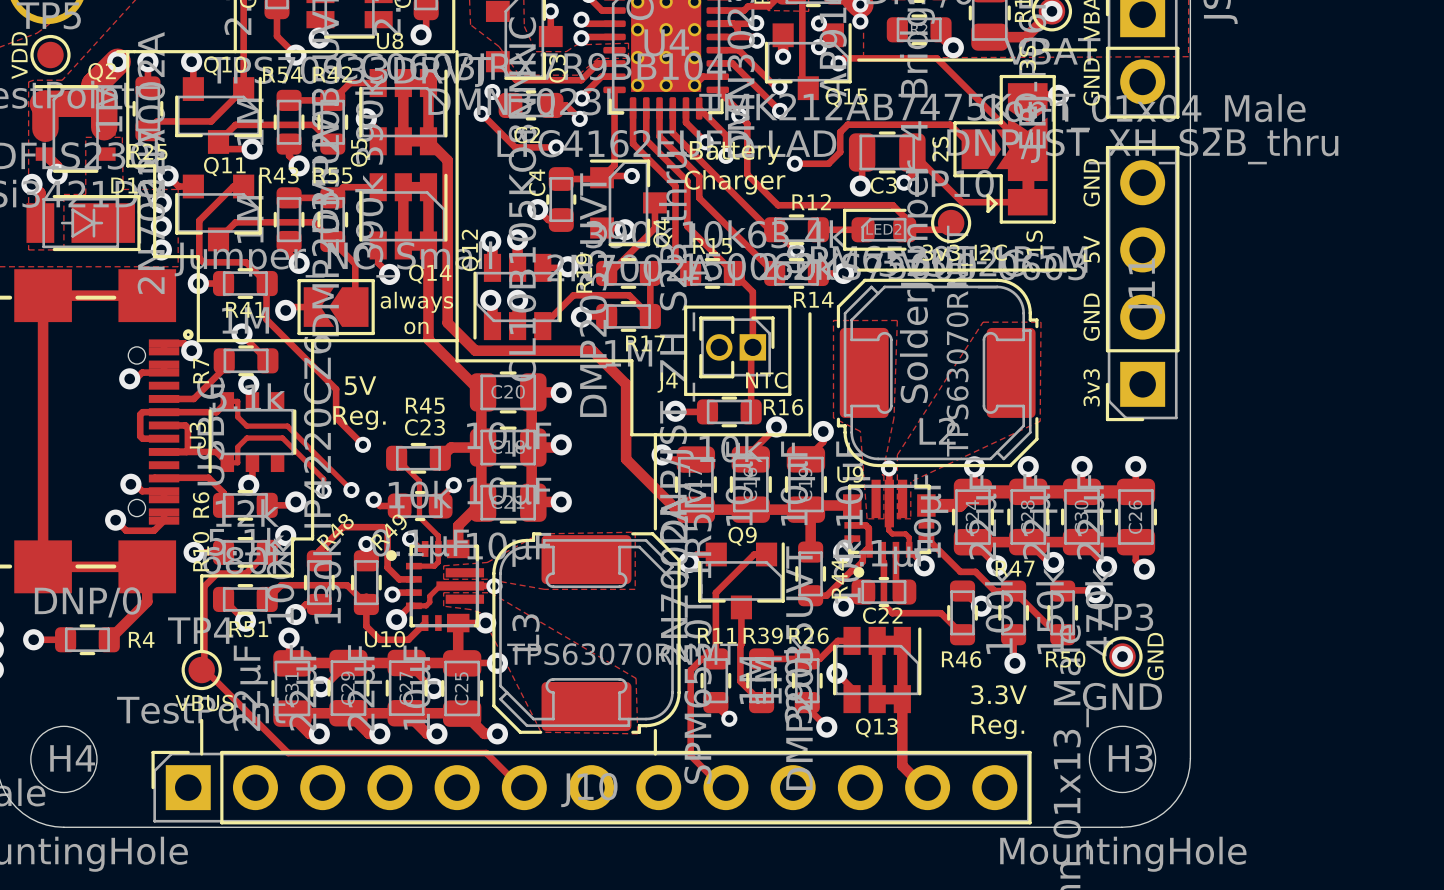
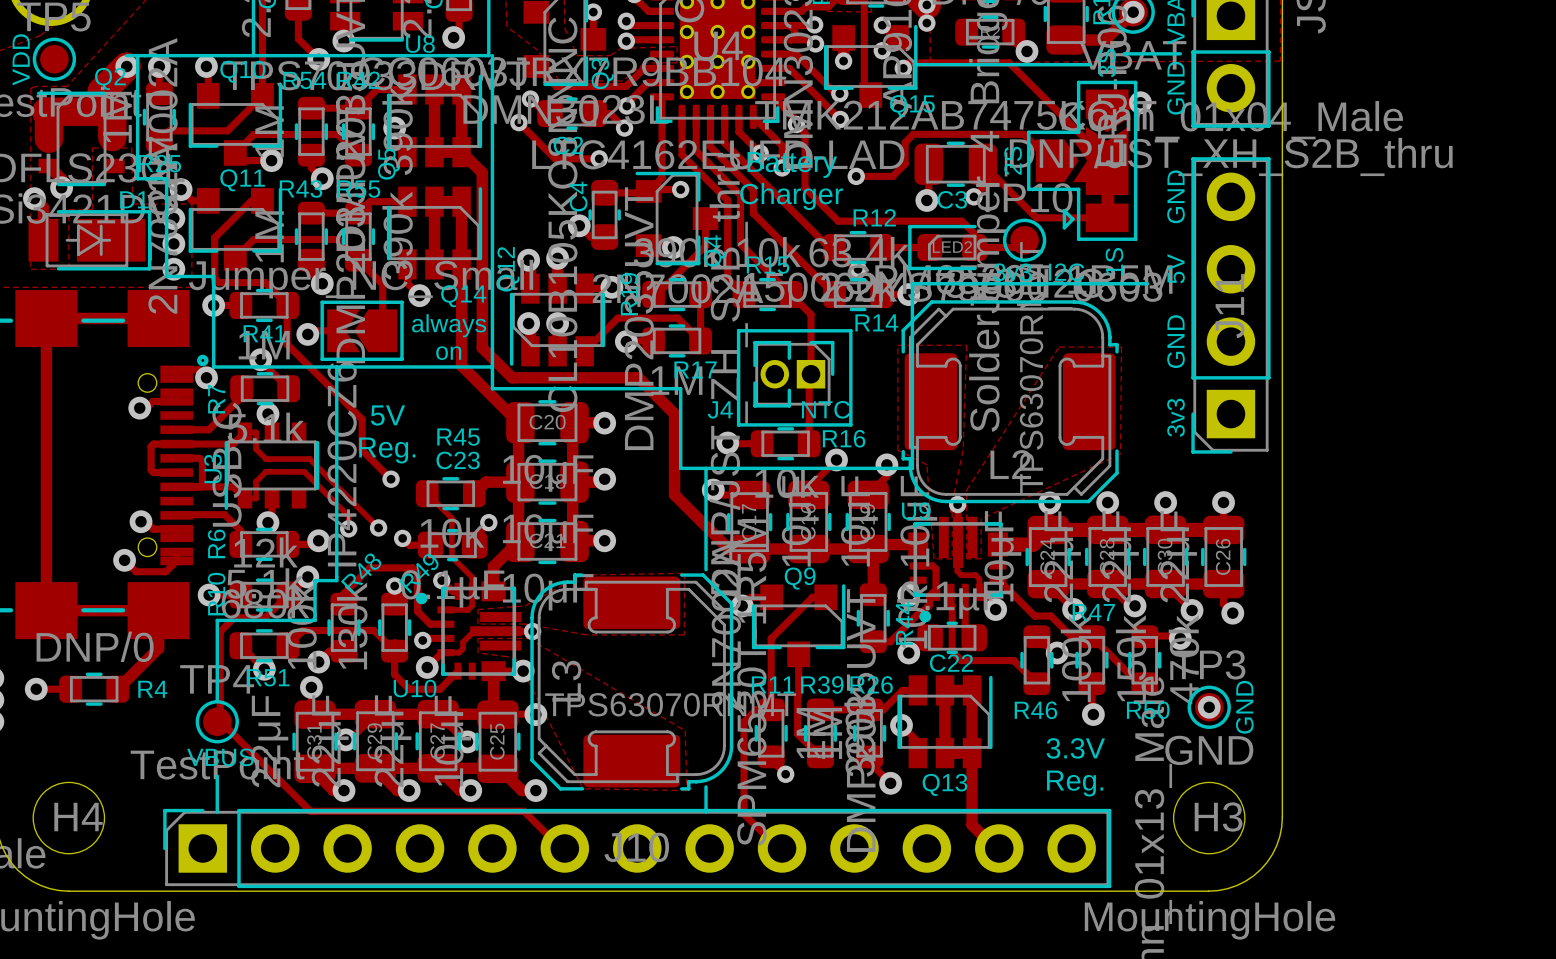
line: none -> (914, 64) (925, 64)
line: (858, 270) (1075, 270) -> none
line: (809, 313) (809, 434) -> (1147, 283) (912, 283) (912, 468) (872, 468)

